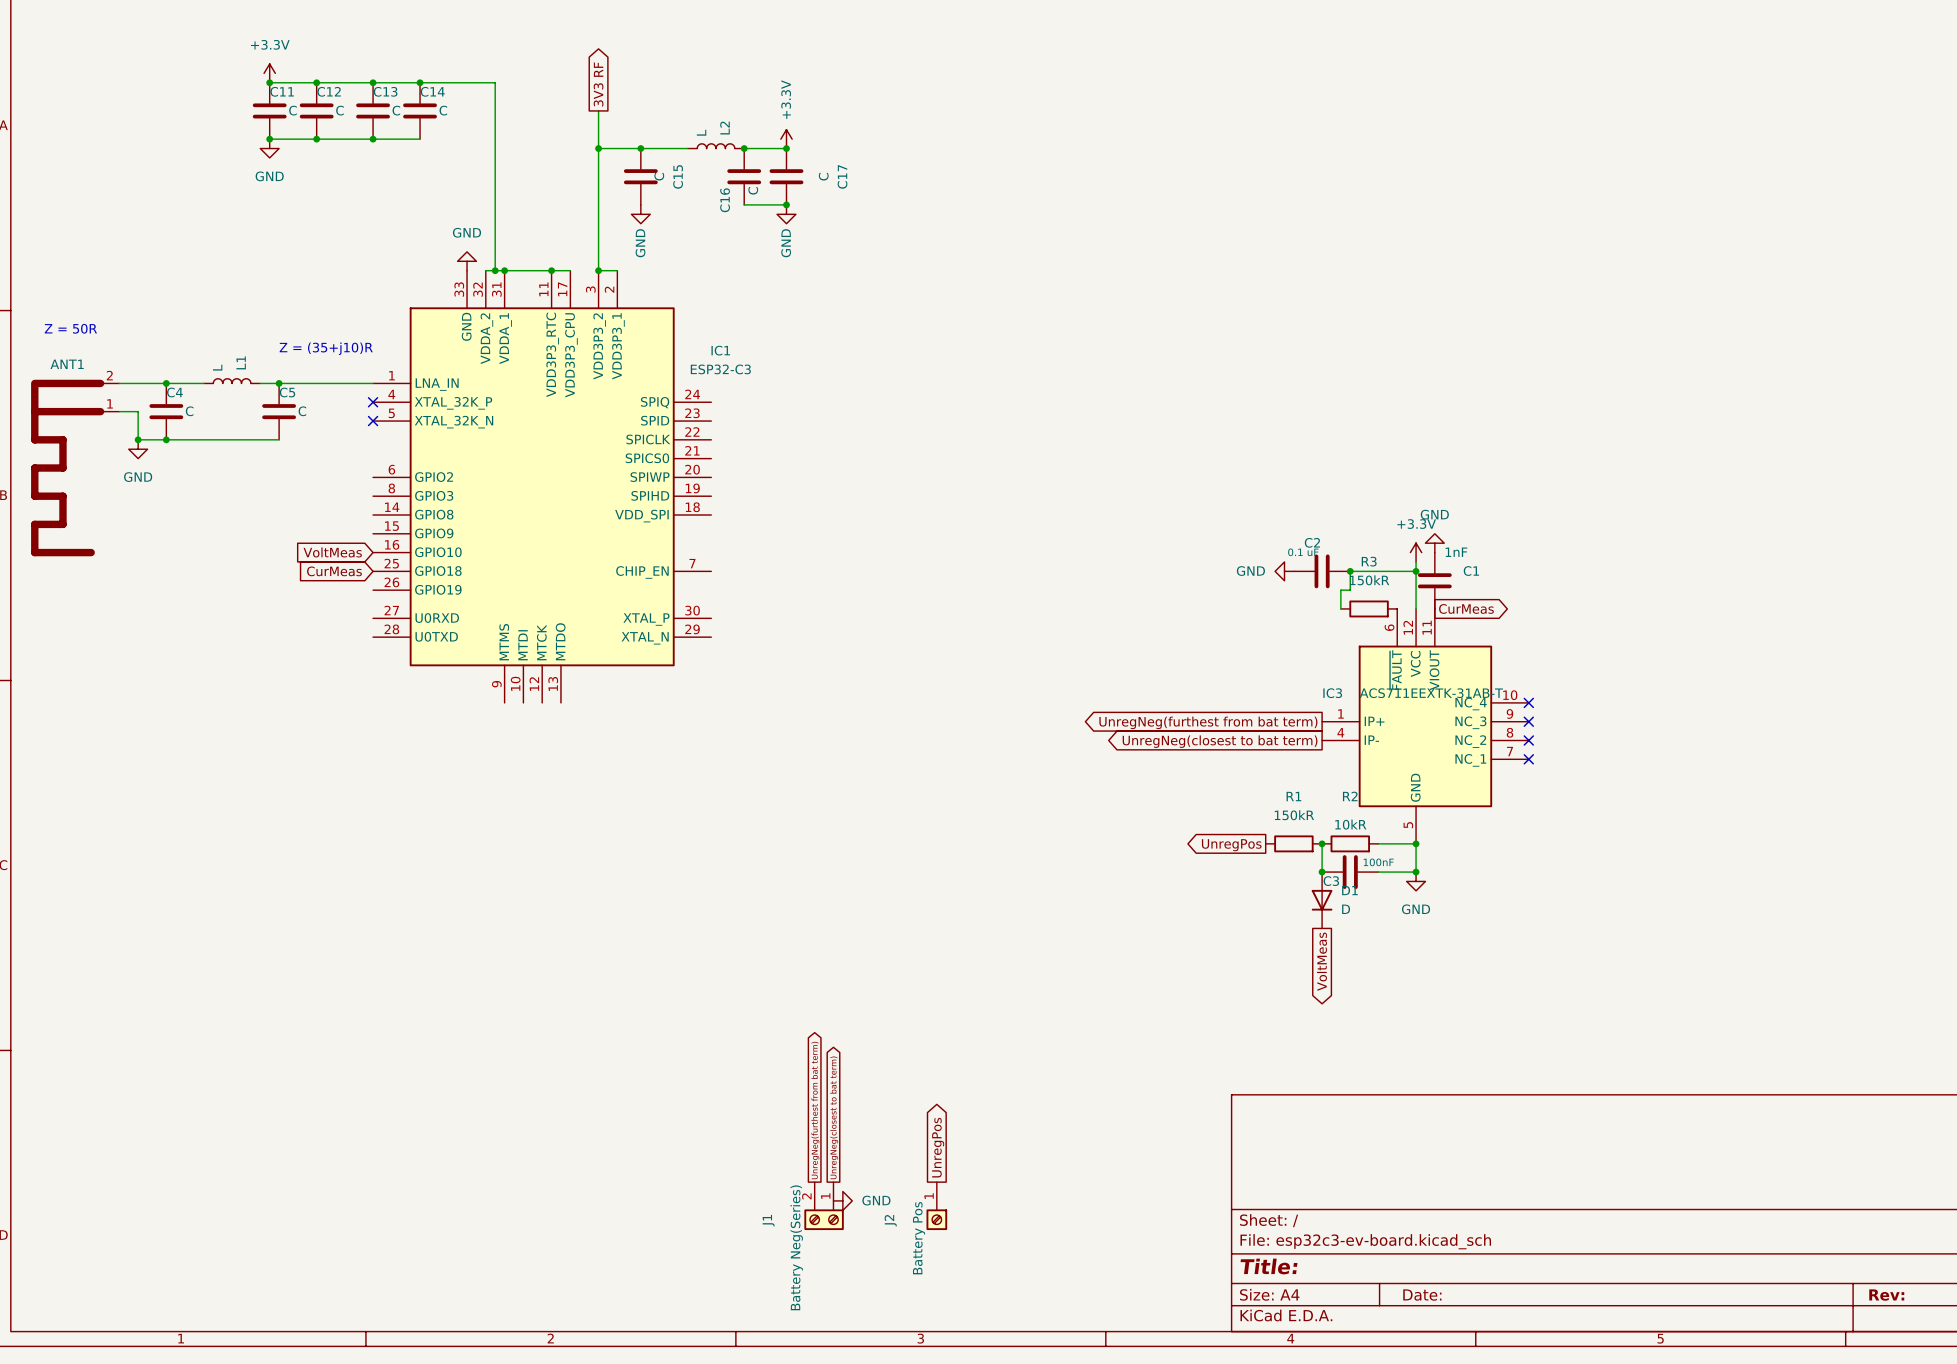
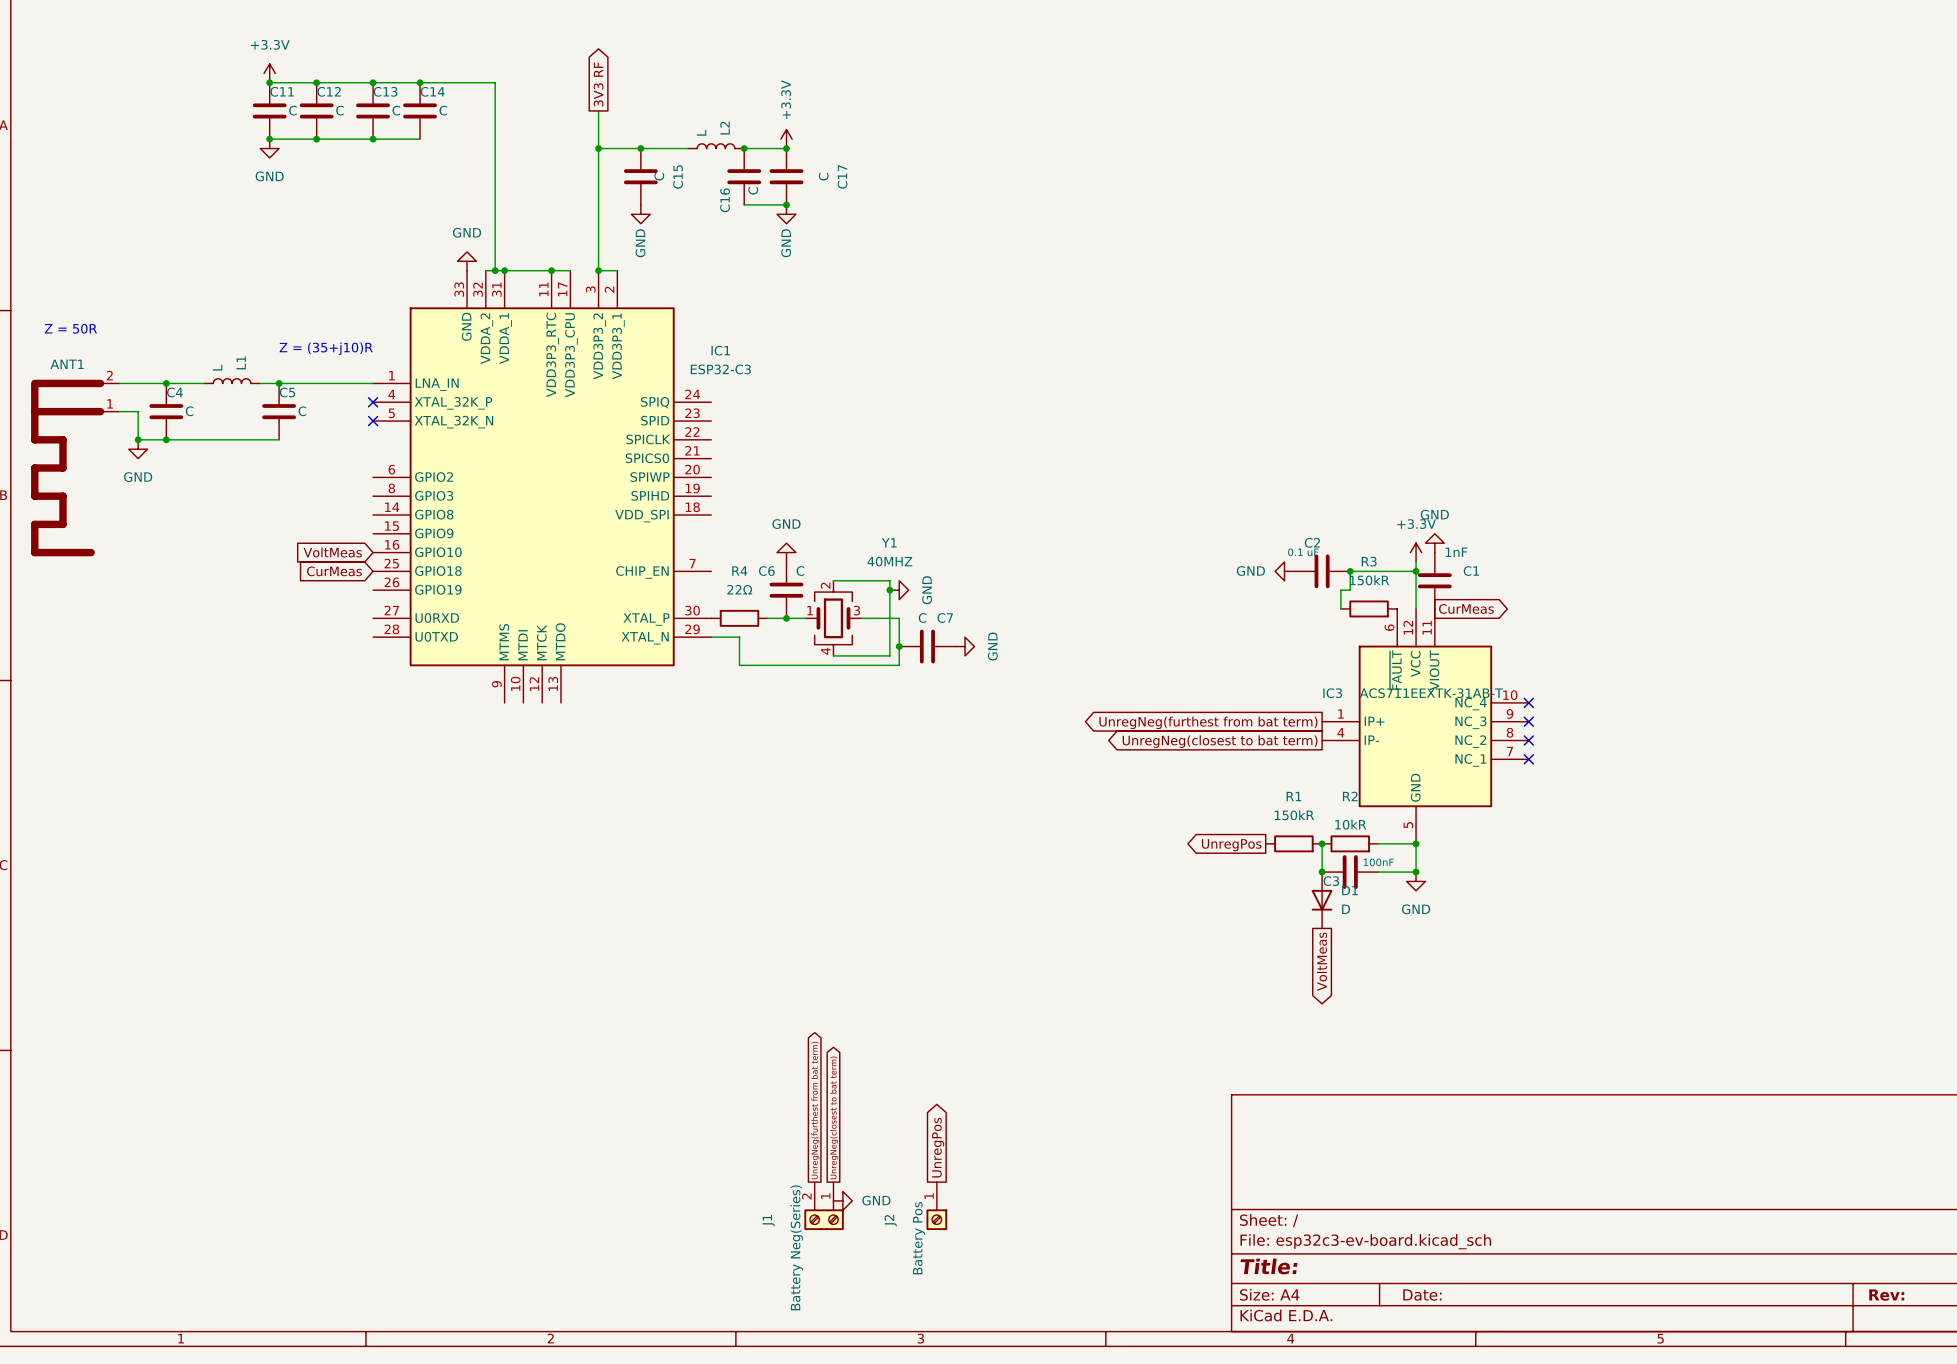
power symbol: none -> GND (786, 552)
wire: none -> (833, 580) (889, 580) (889, 655) (833, 655)
C6: none -> C (786, 590)
junction: none -> (889, 590)
power symbol: none -> GND (899, 590)
R4: none -> 22Ω (739, 618)
wire: none -> (767, 618) (805, 618)
junction: none -> (786, 618)
Y1: none -> 40MHZ (833, 618)
wire: none -> (861, 618) (899, 618) (899, 665) (739, 665) (739, 637) (711, 637)
junction: none -> (899, 646)
C7: none -> C (927, 646)
power symbol: none -> GND (965, 646)

